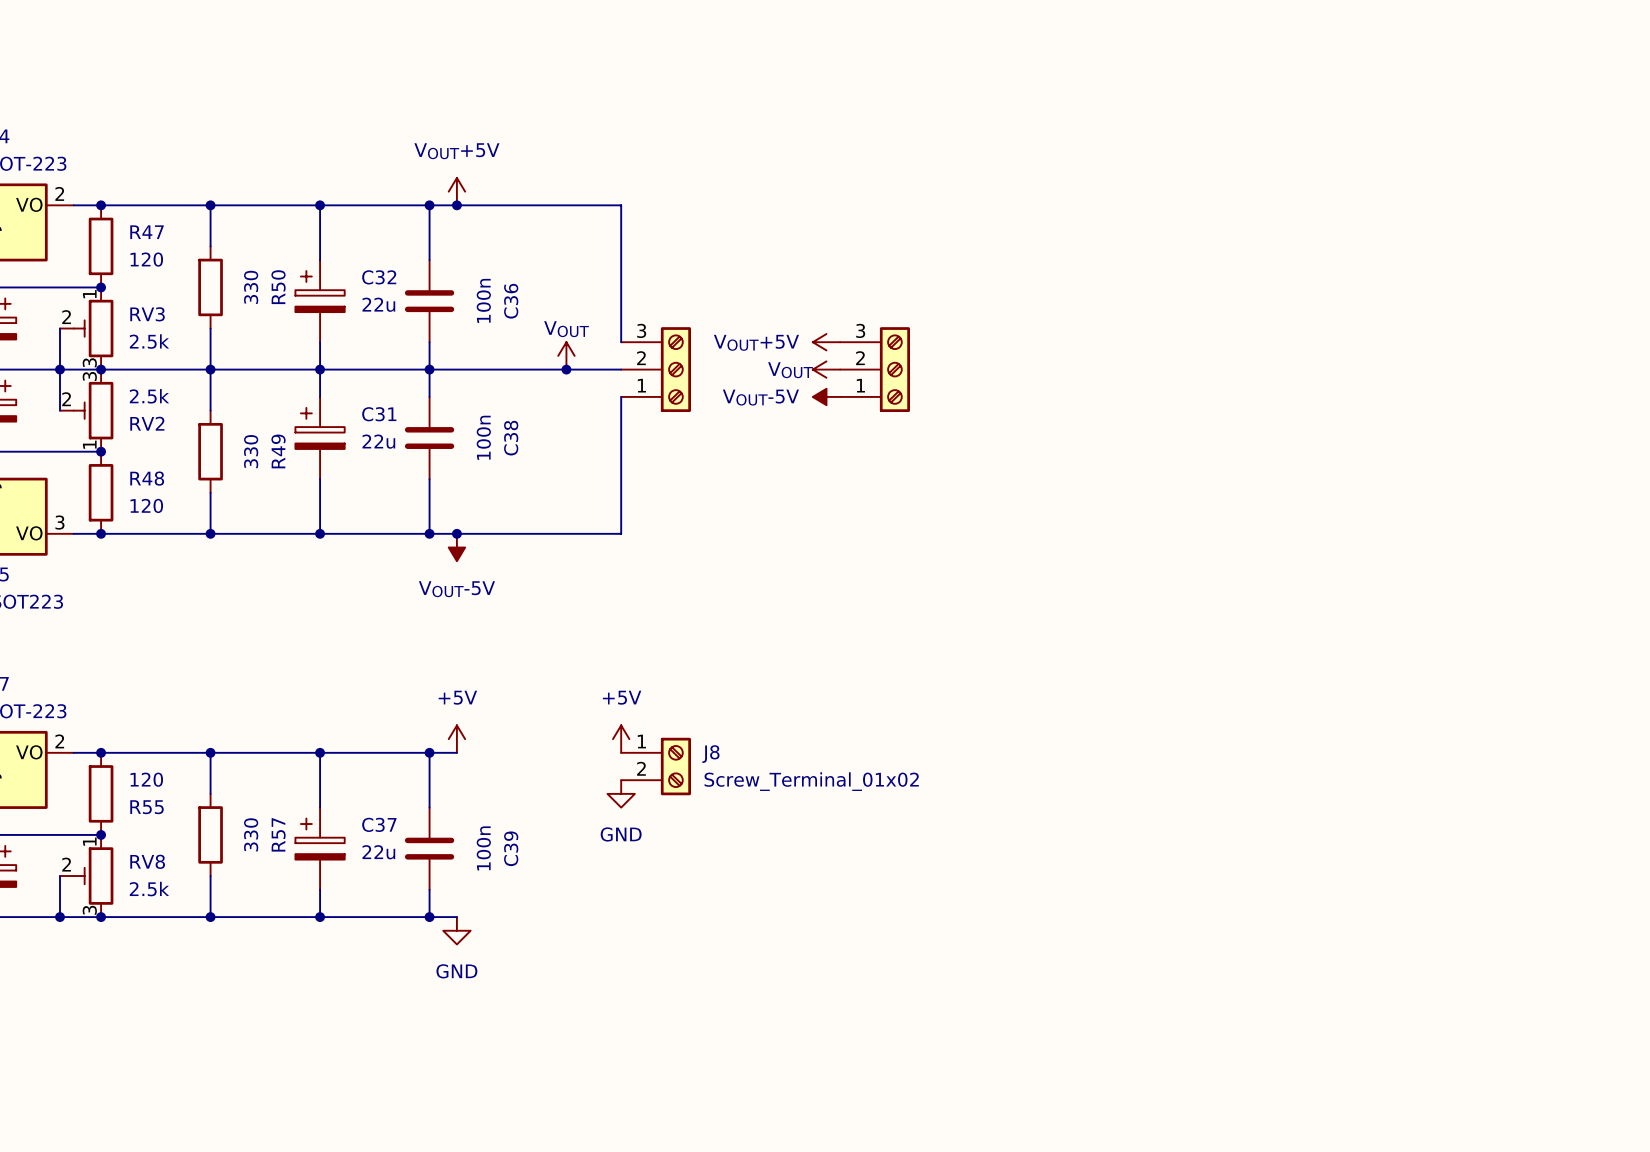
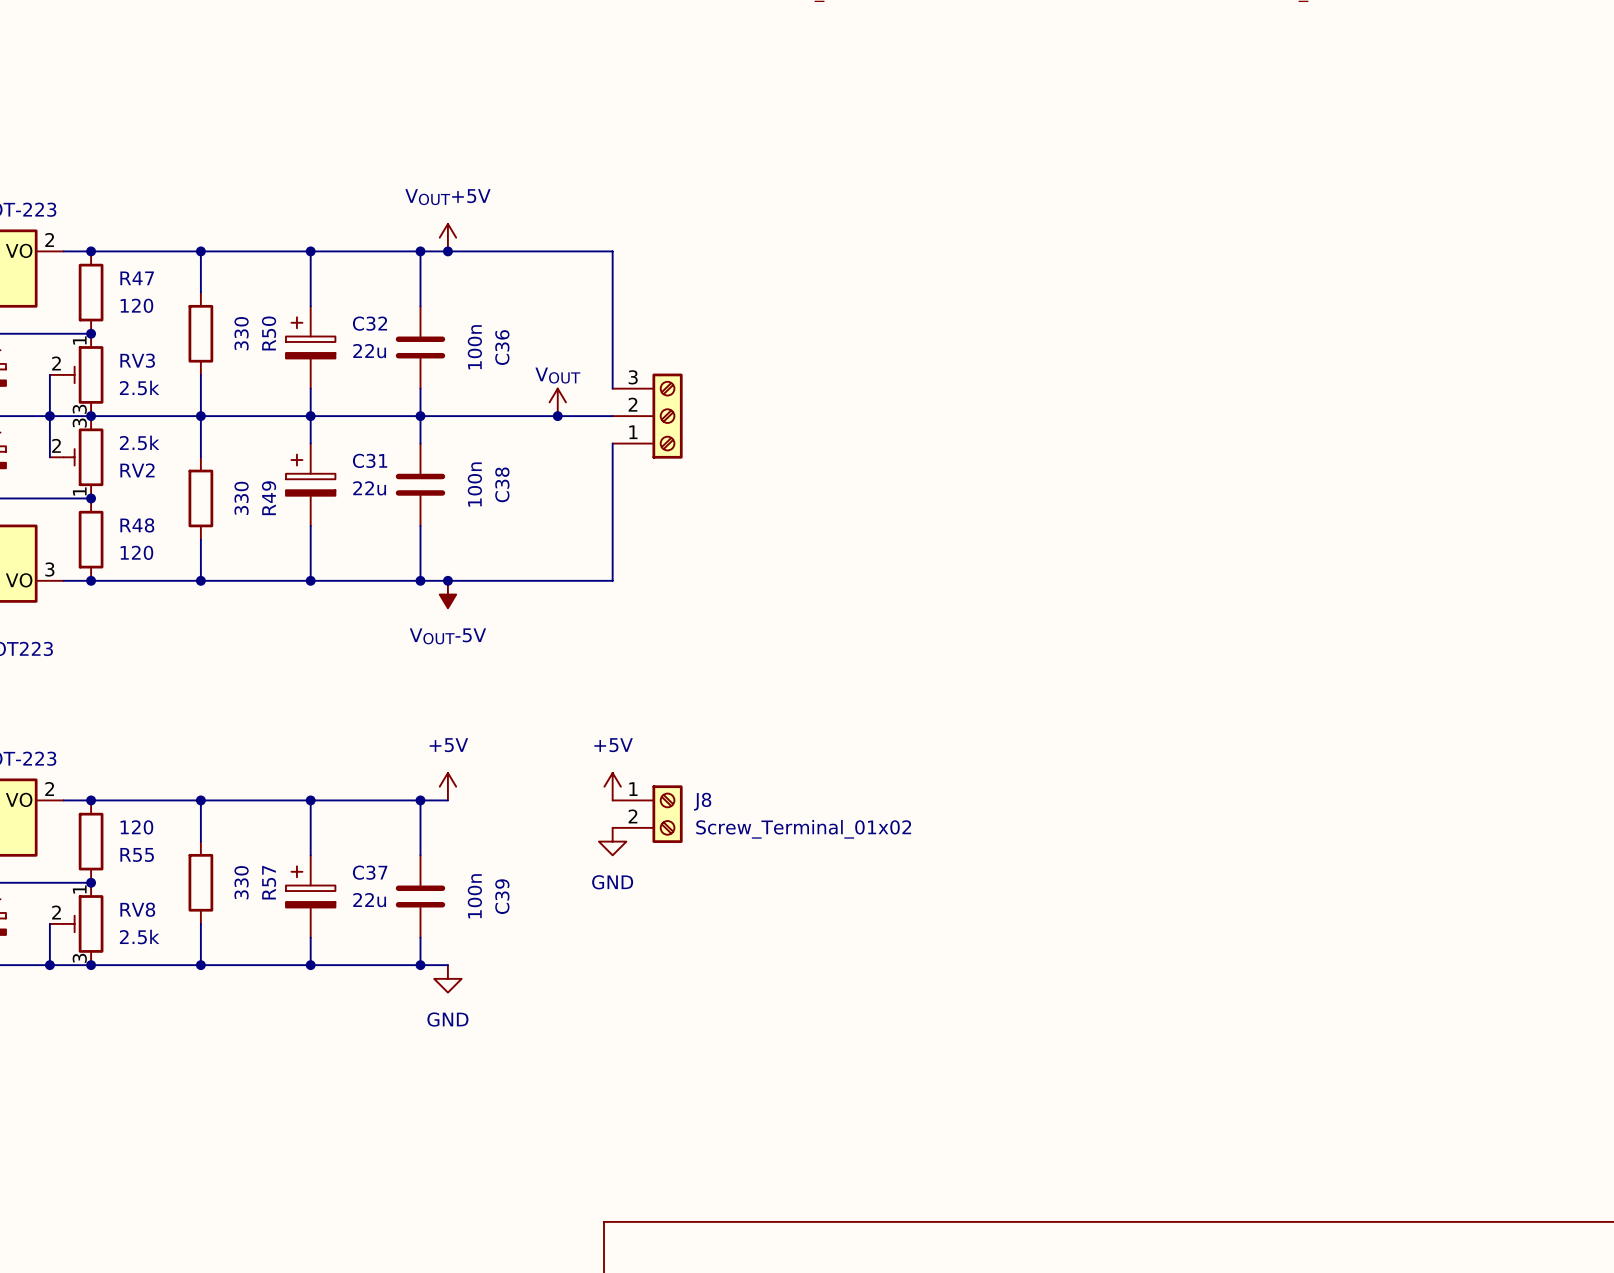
power symbol: VOUT+5V (826, 342) -> none
power symbol: VOUT (826, 369) -> none
part: (875, 369) -> none
power symbol: VOUT-5V (826, 396) -> none

